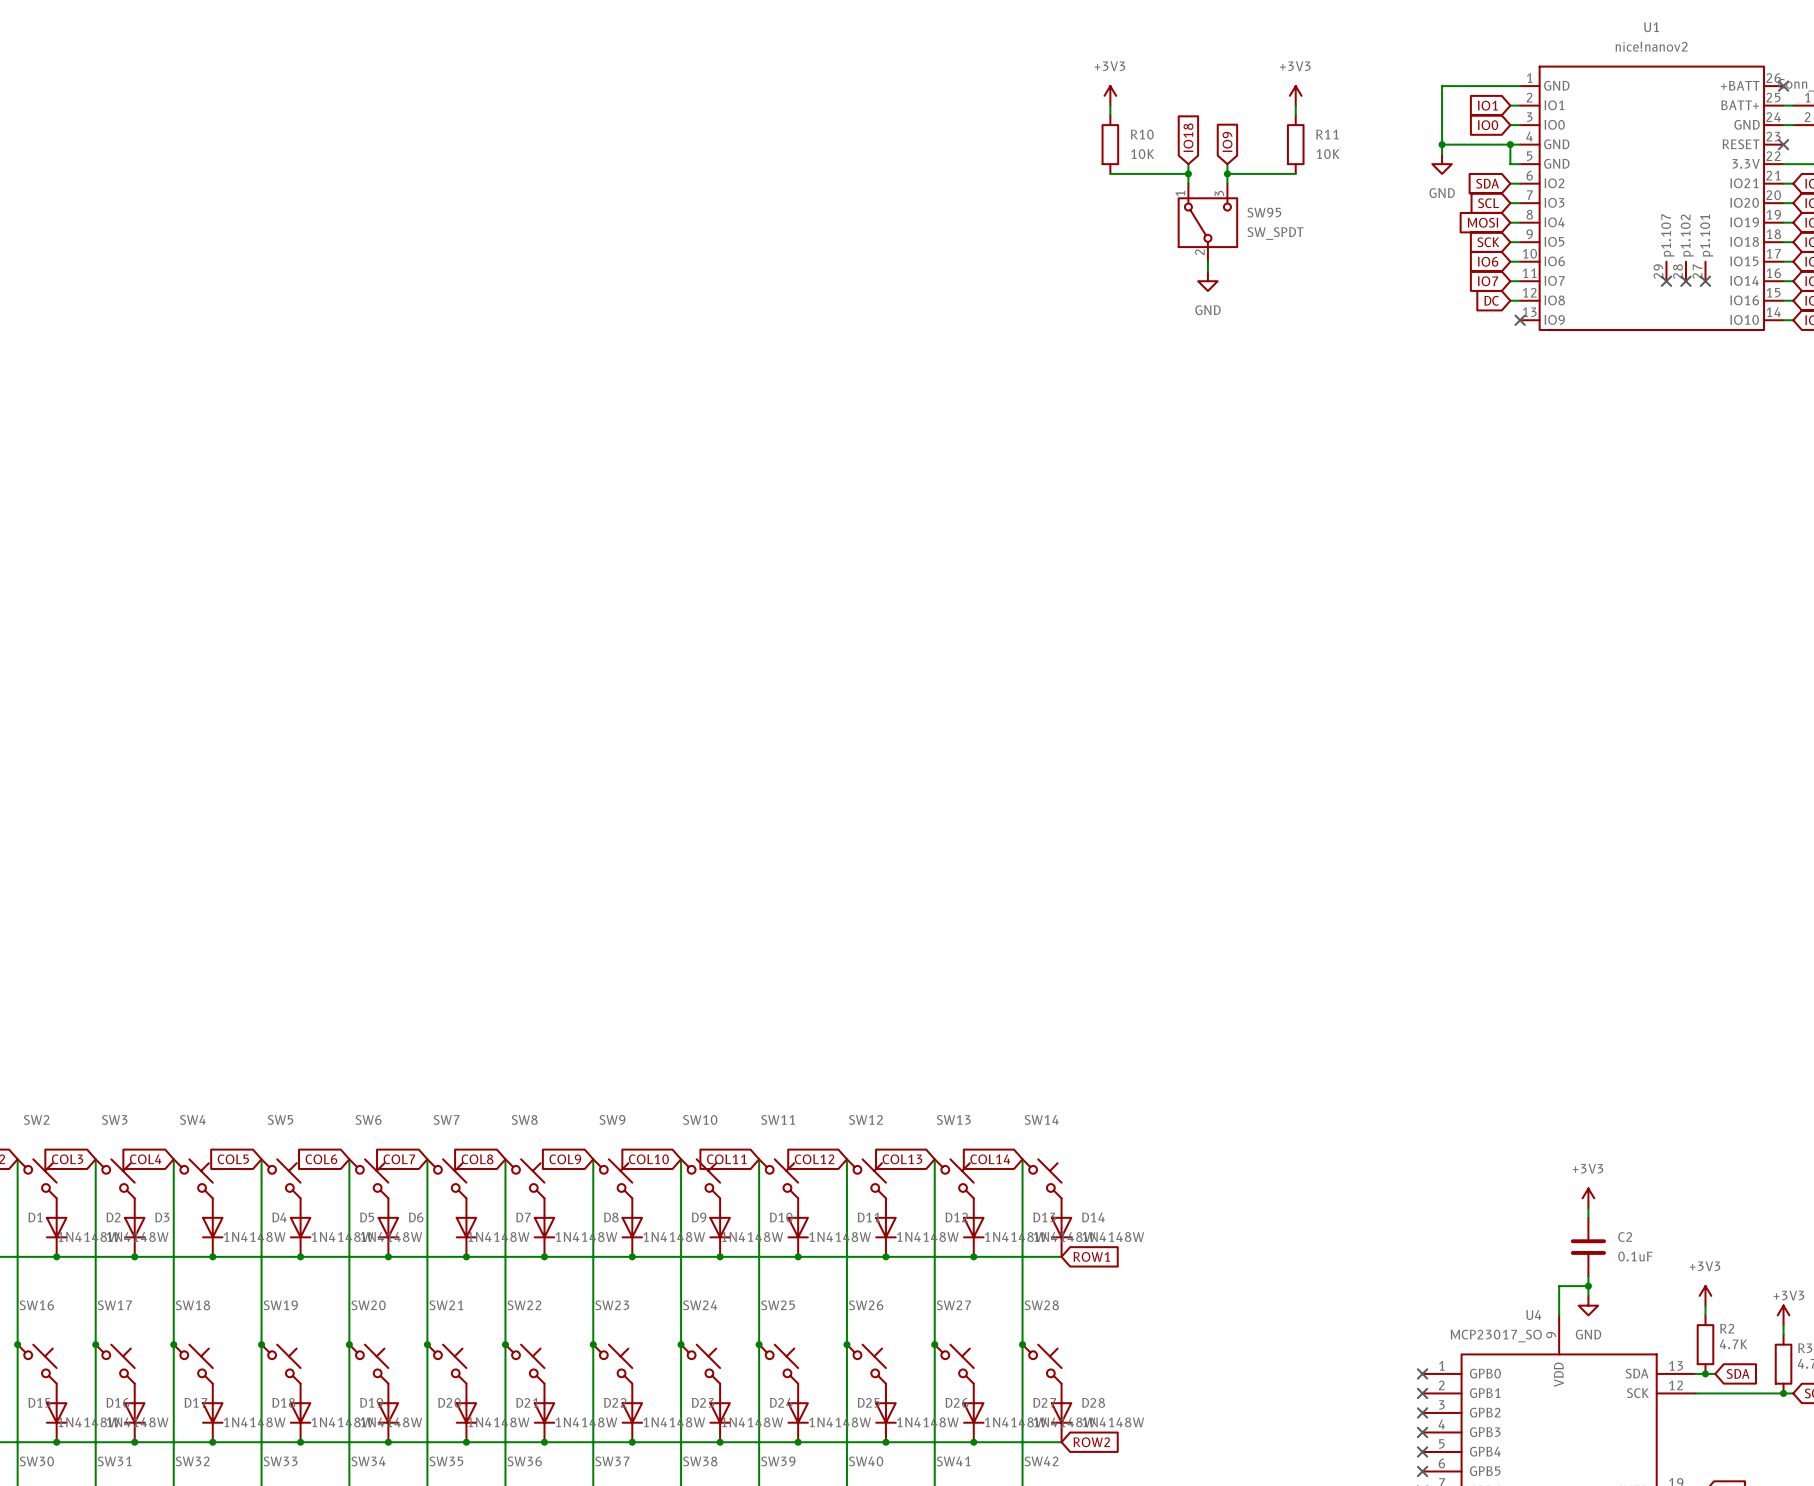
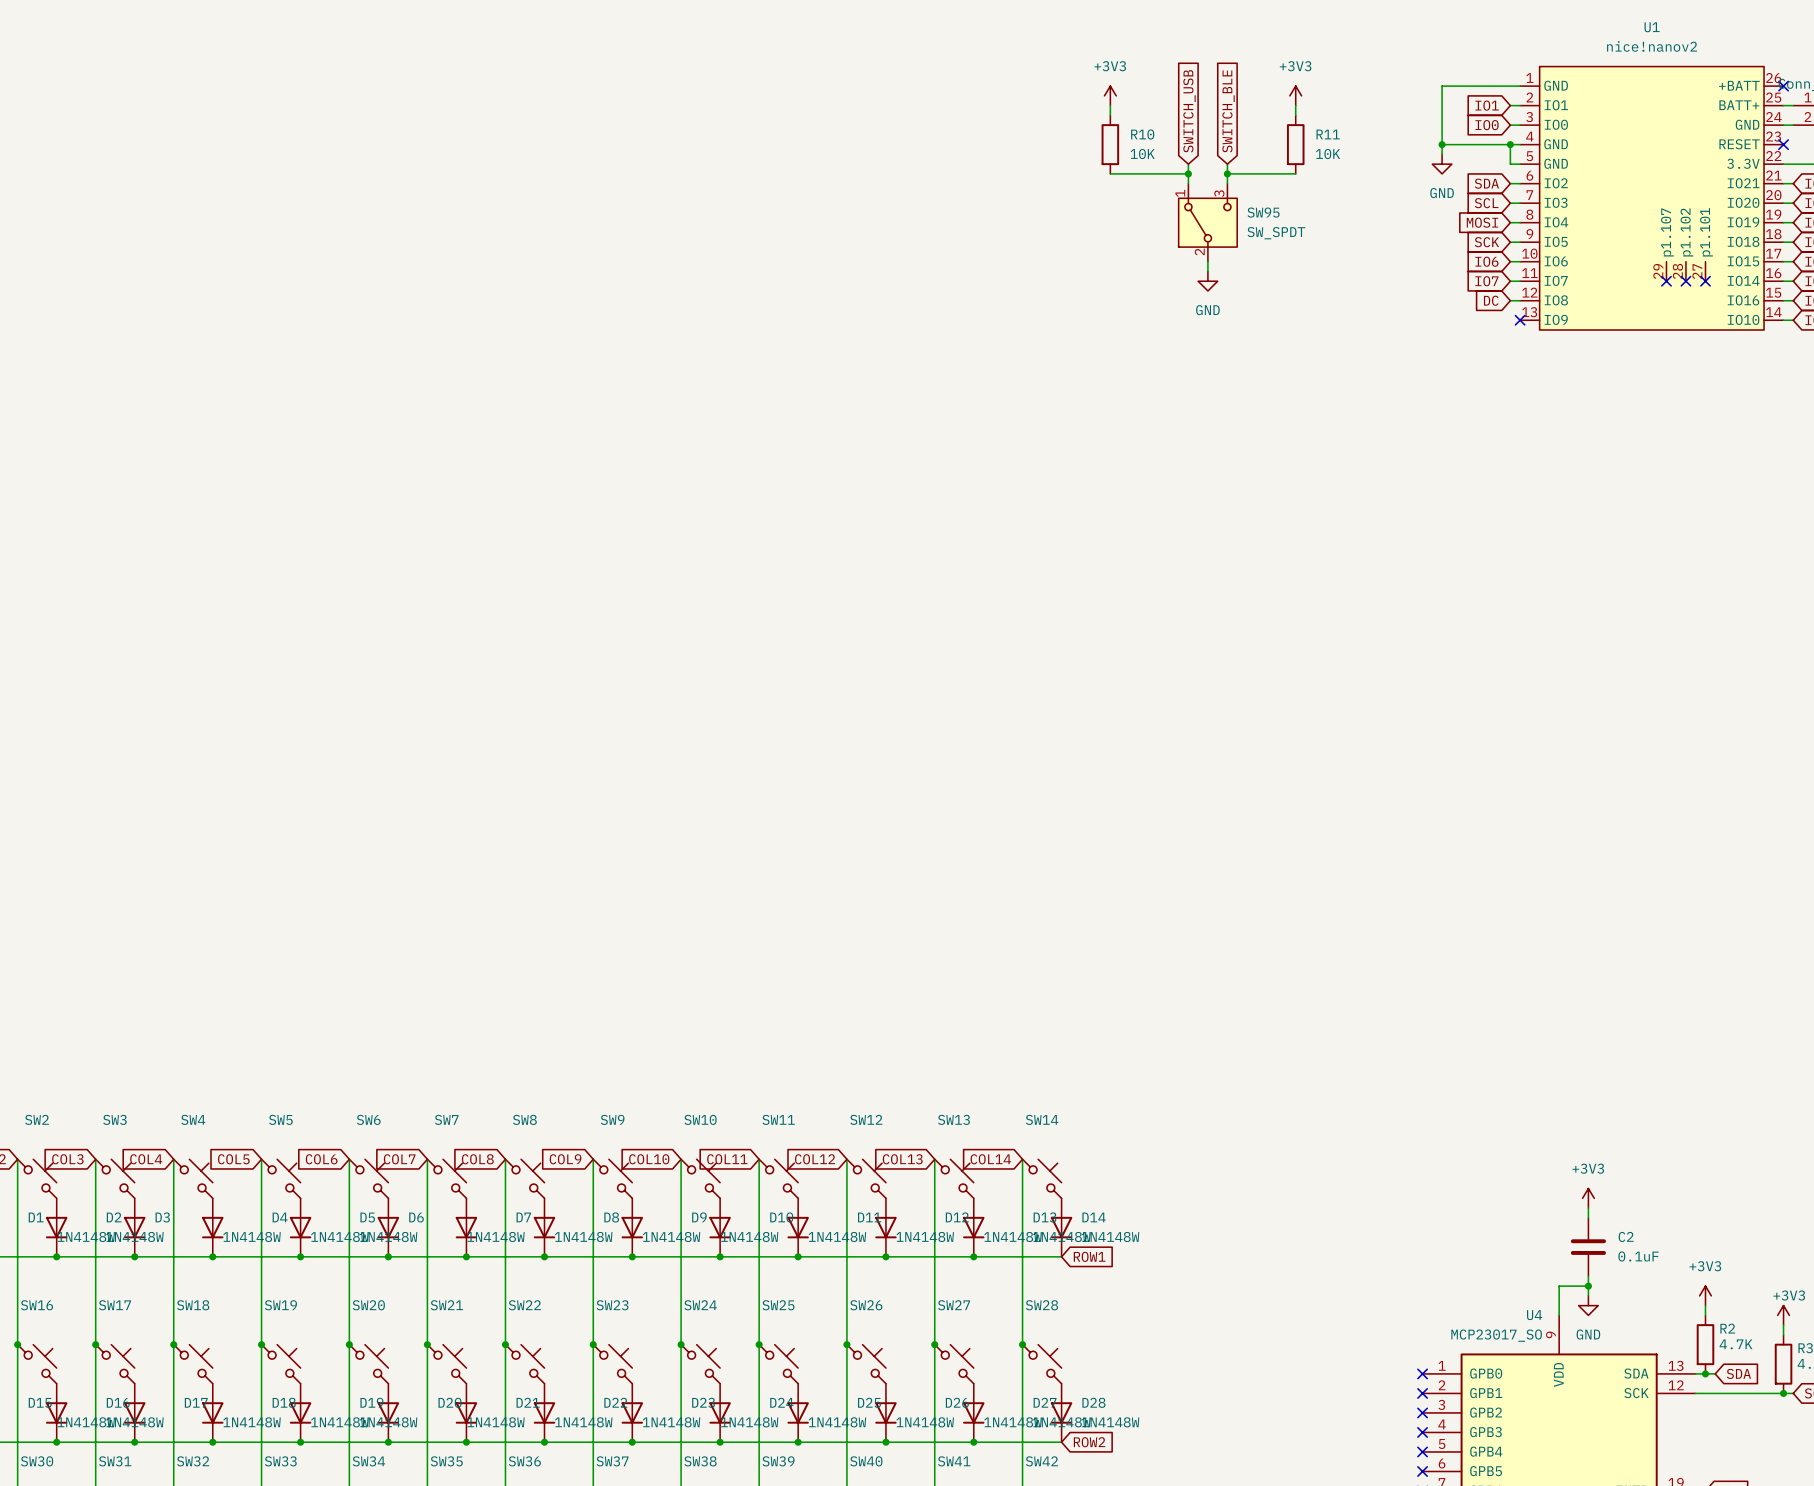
global label: IO18 (1188, 137) -> SWITCH_USB (1189, 111)
global label: IO9 (1227, 142) -> SWITCH_BLE (1228, 111)

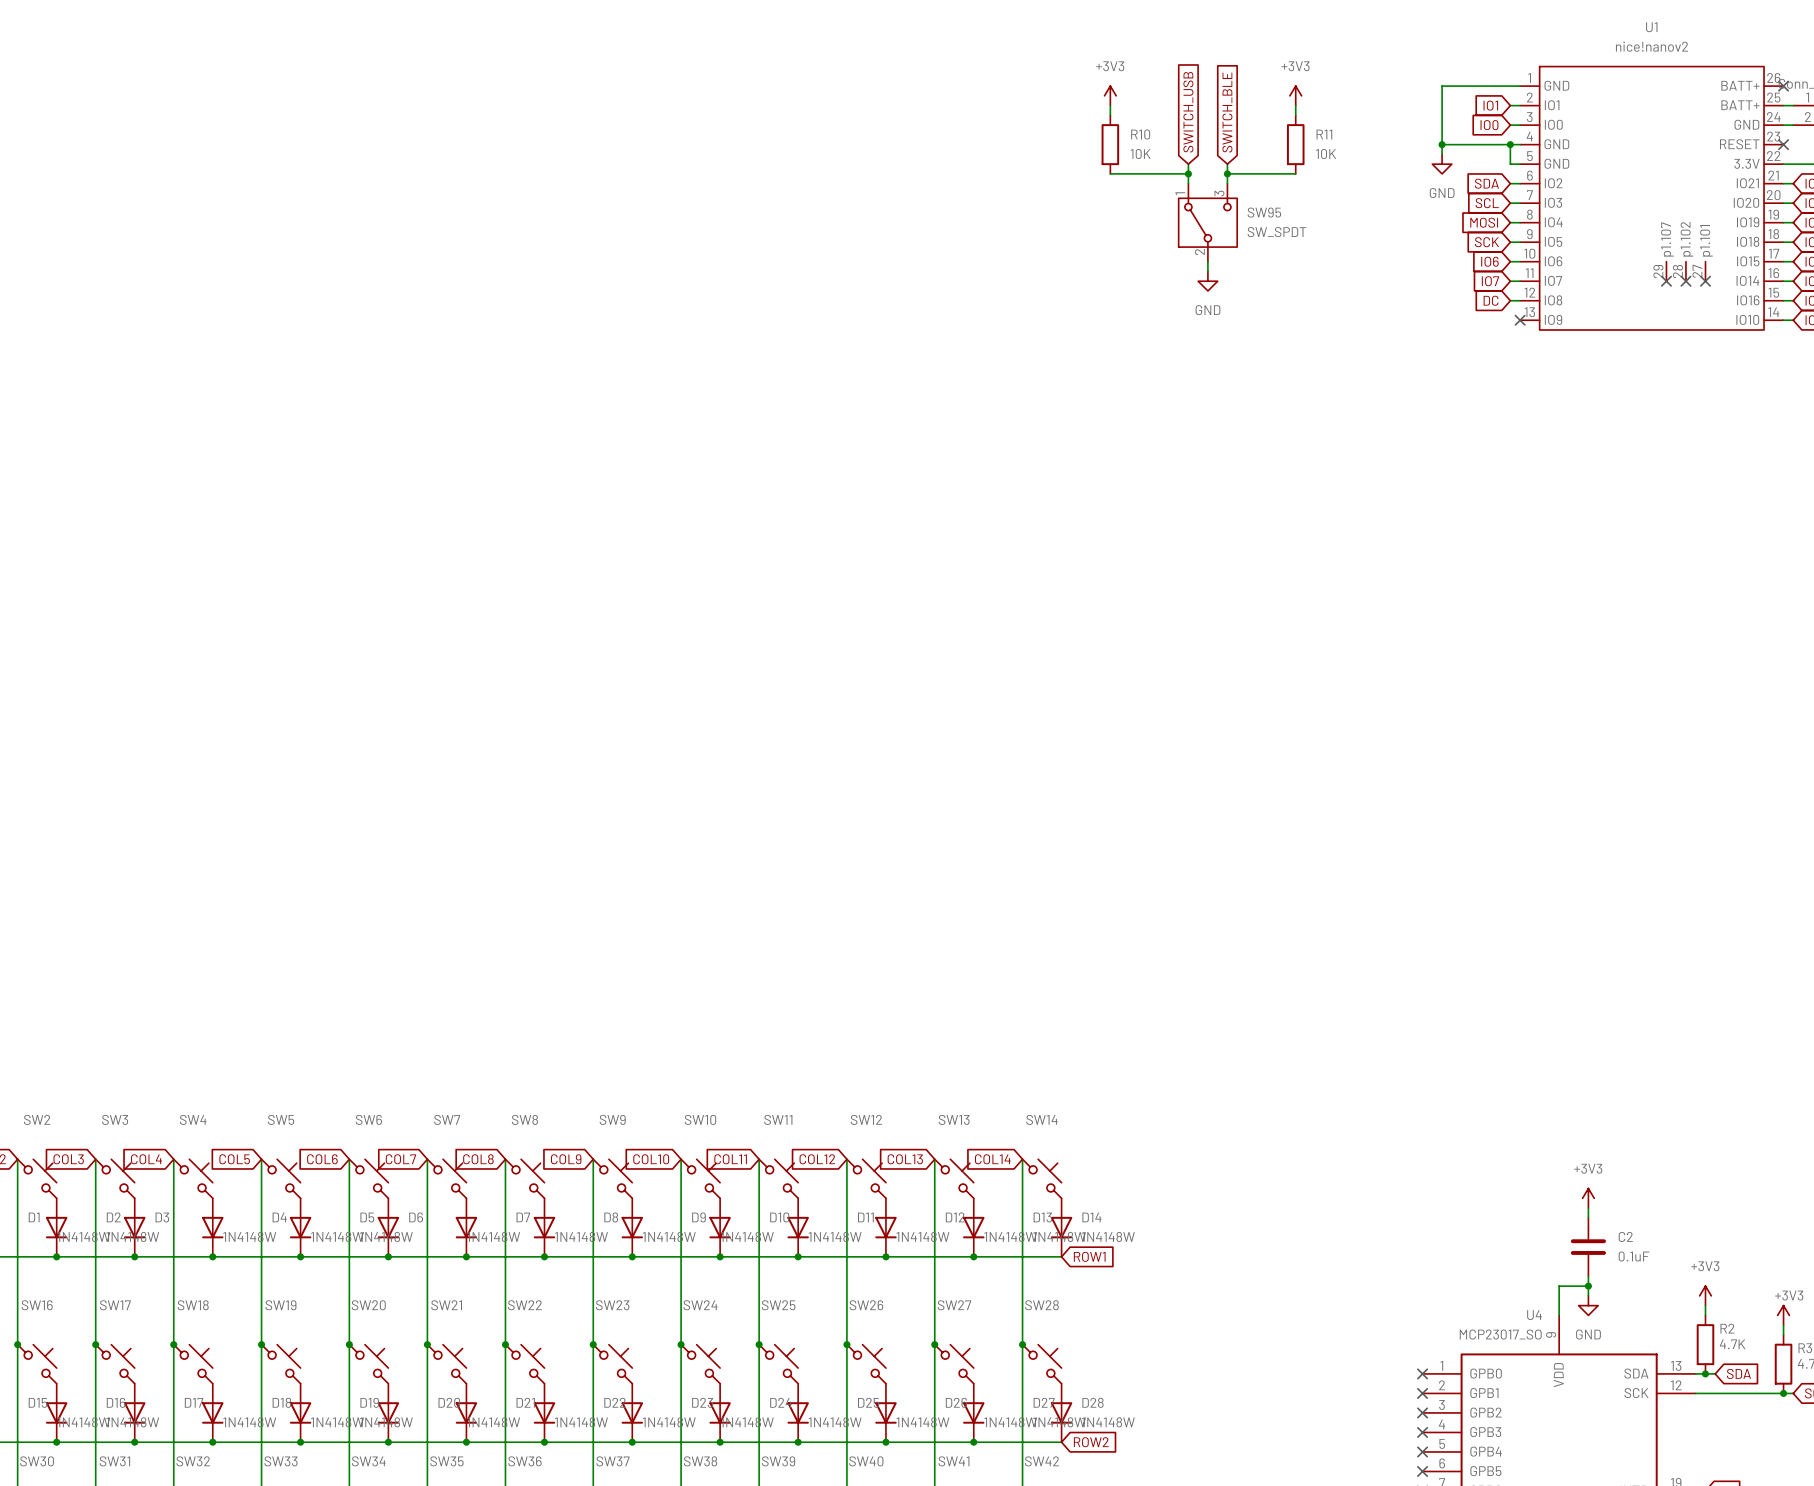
U1 pin name: +BATT (1739, 85) -> BATT+ (1740, 85)

